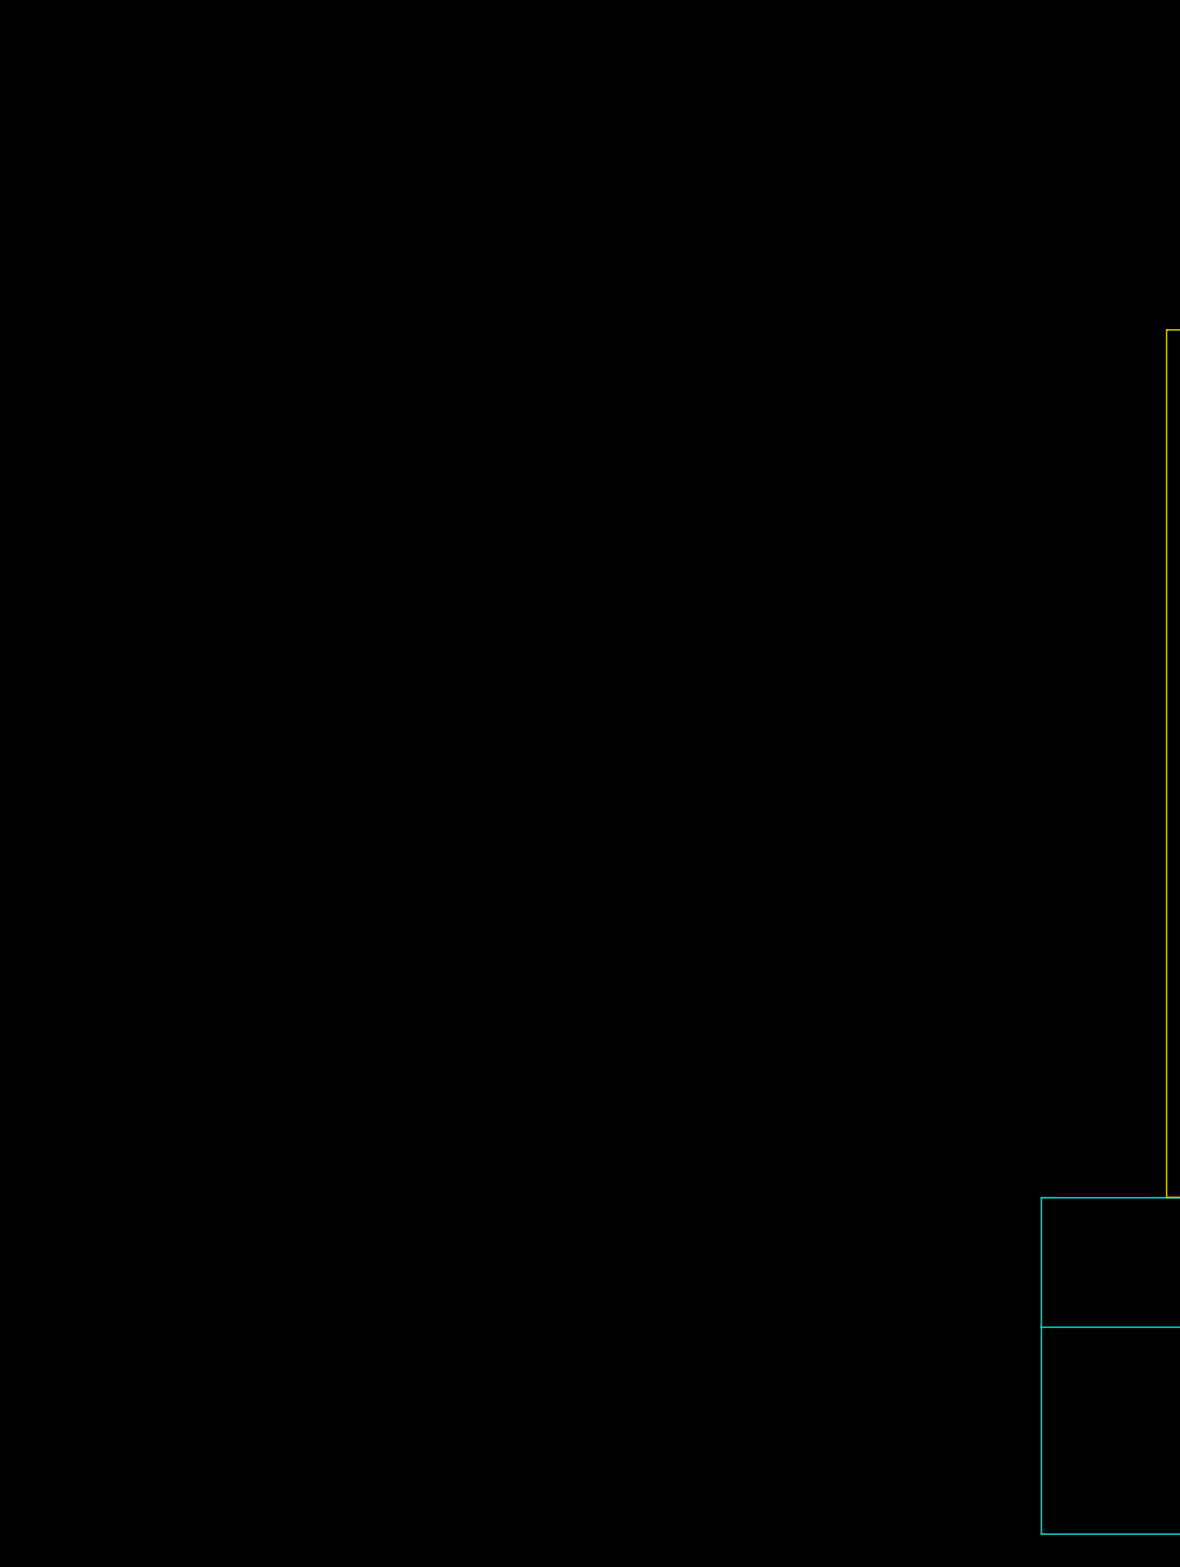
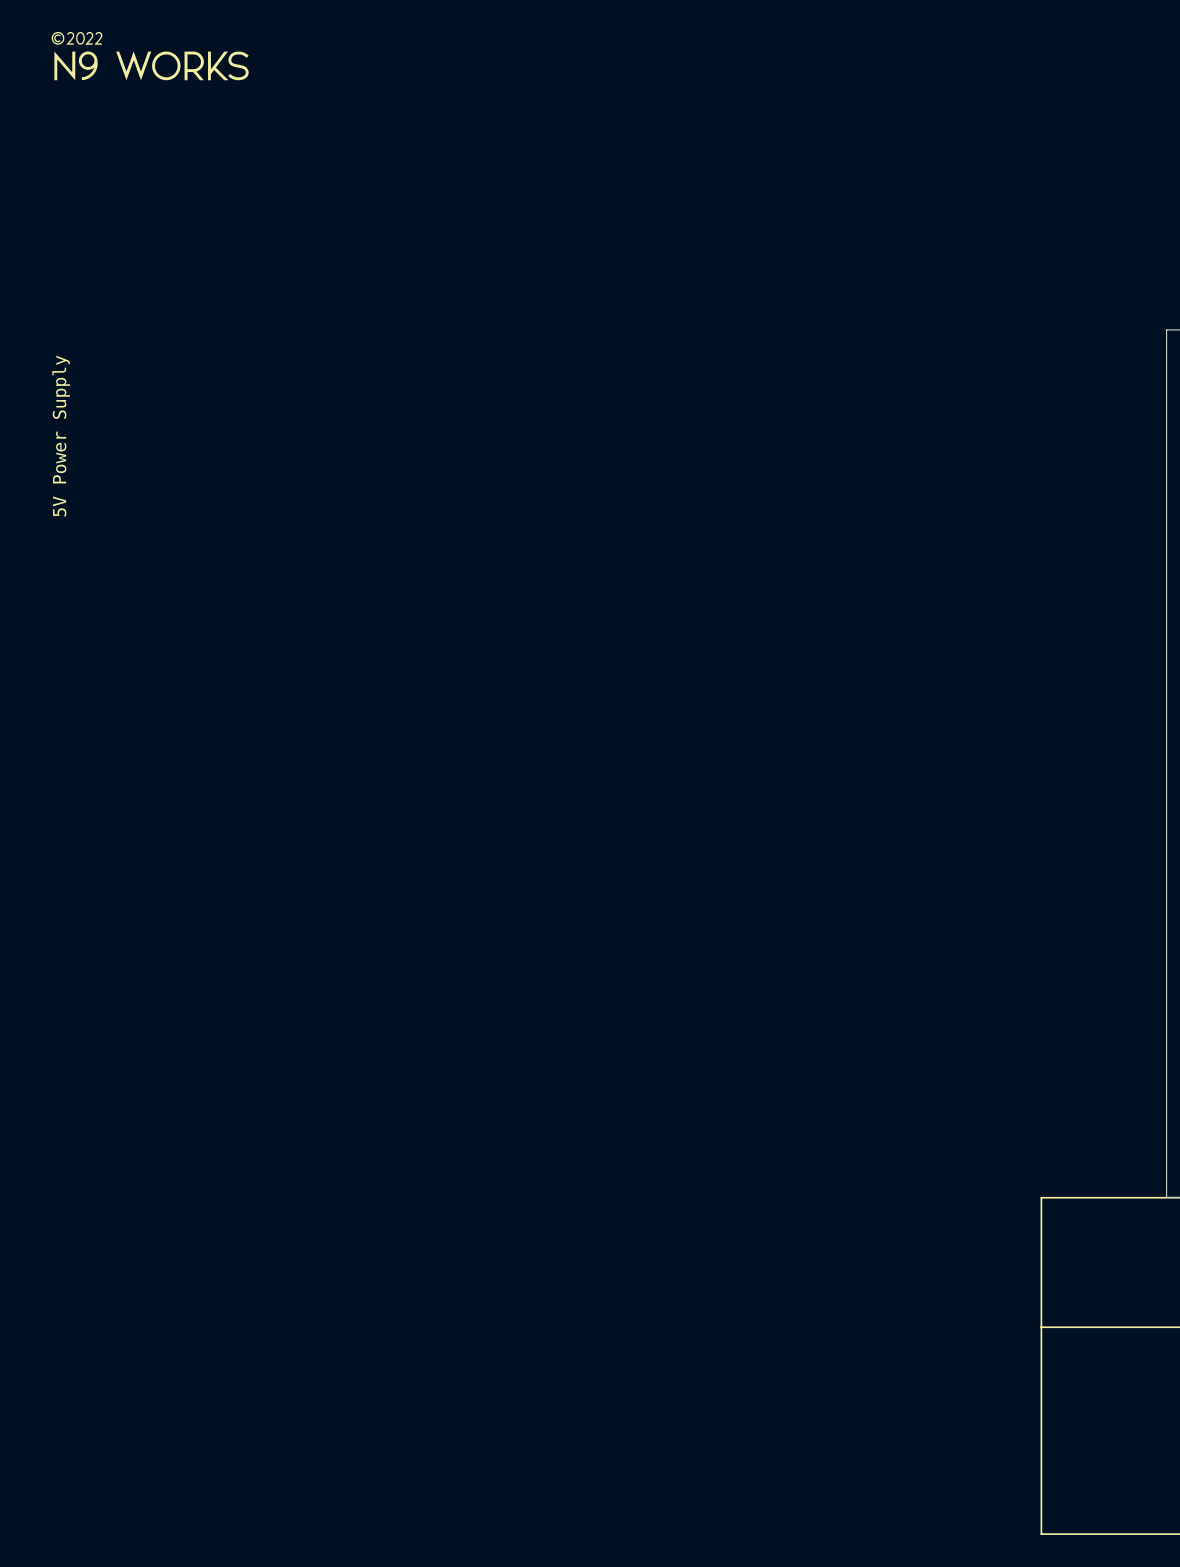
drawing: none -> [51, 31, 249, 81]
text: none -> 5V Power Supply (61, 436)

